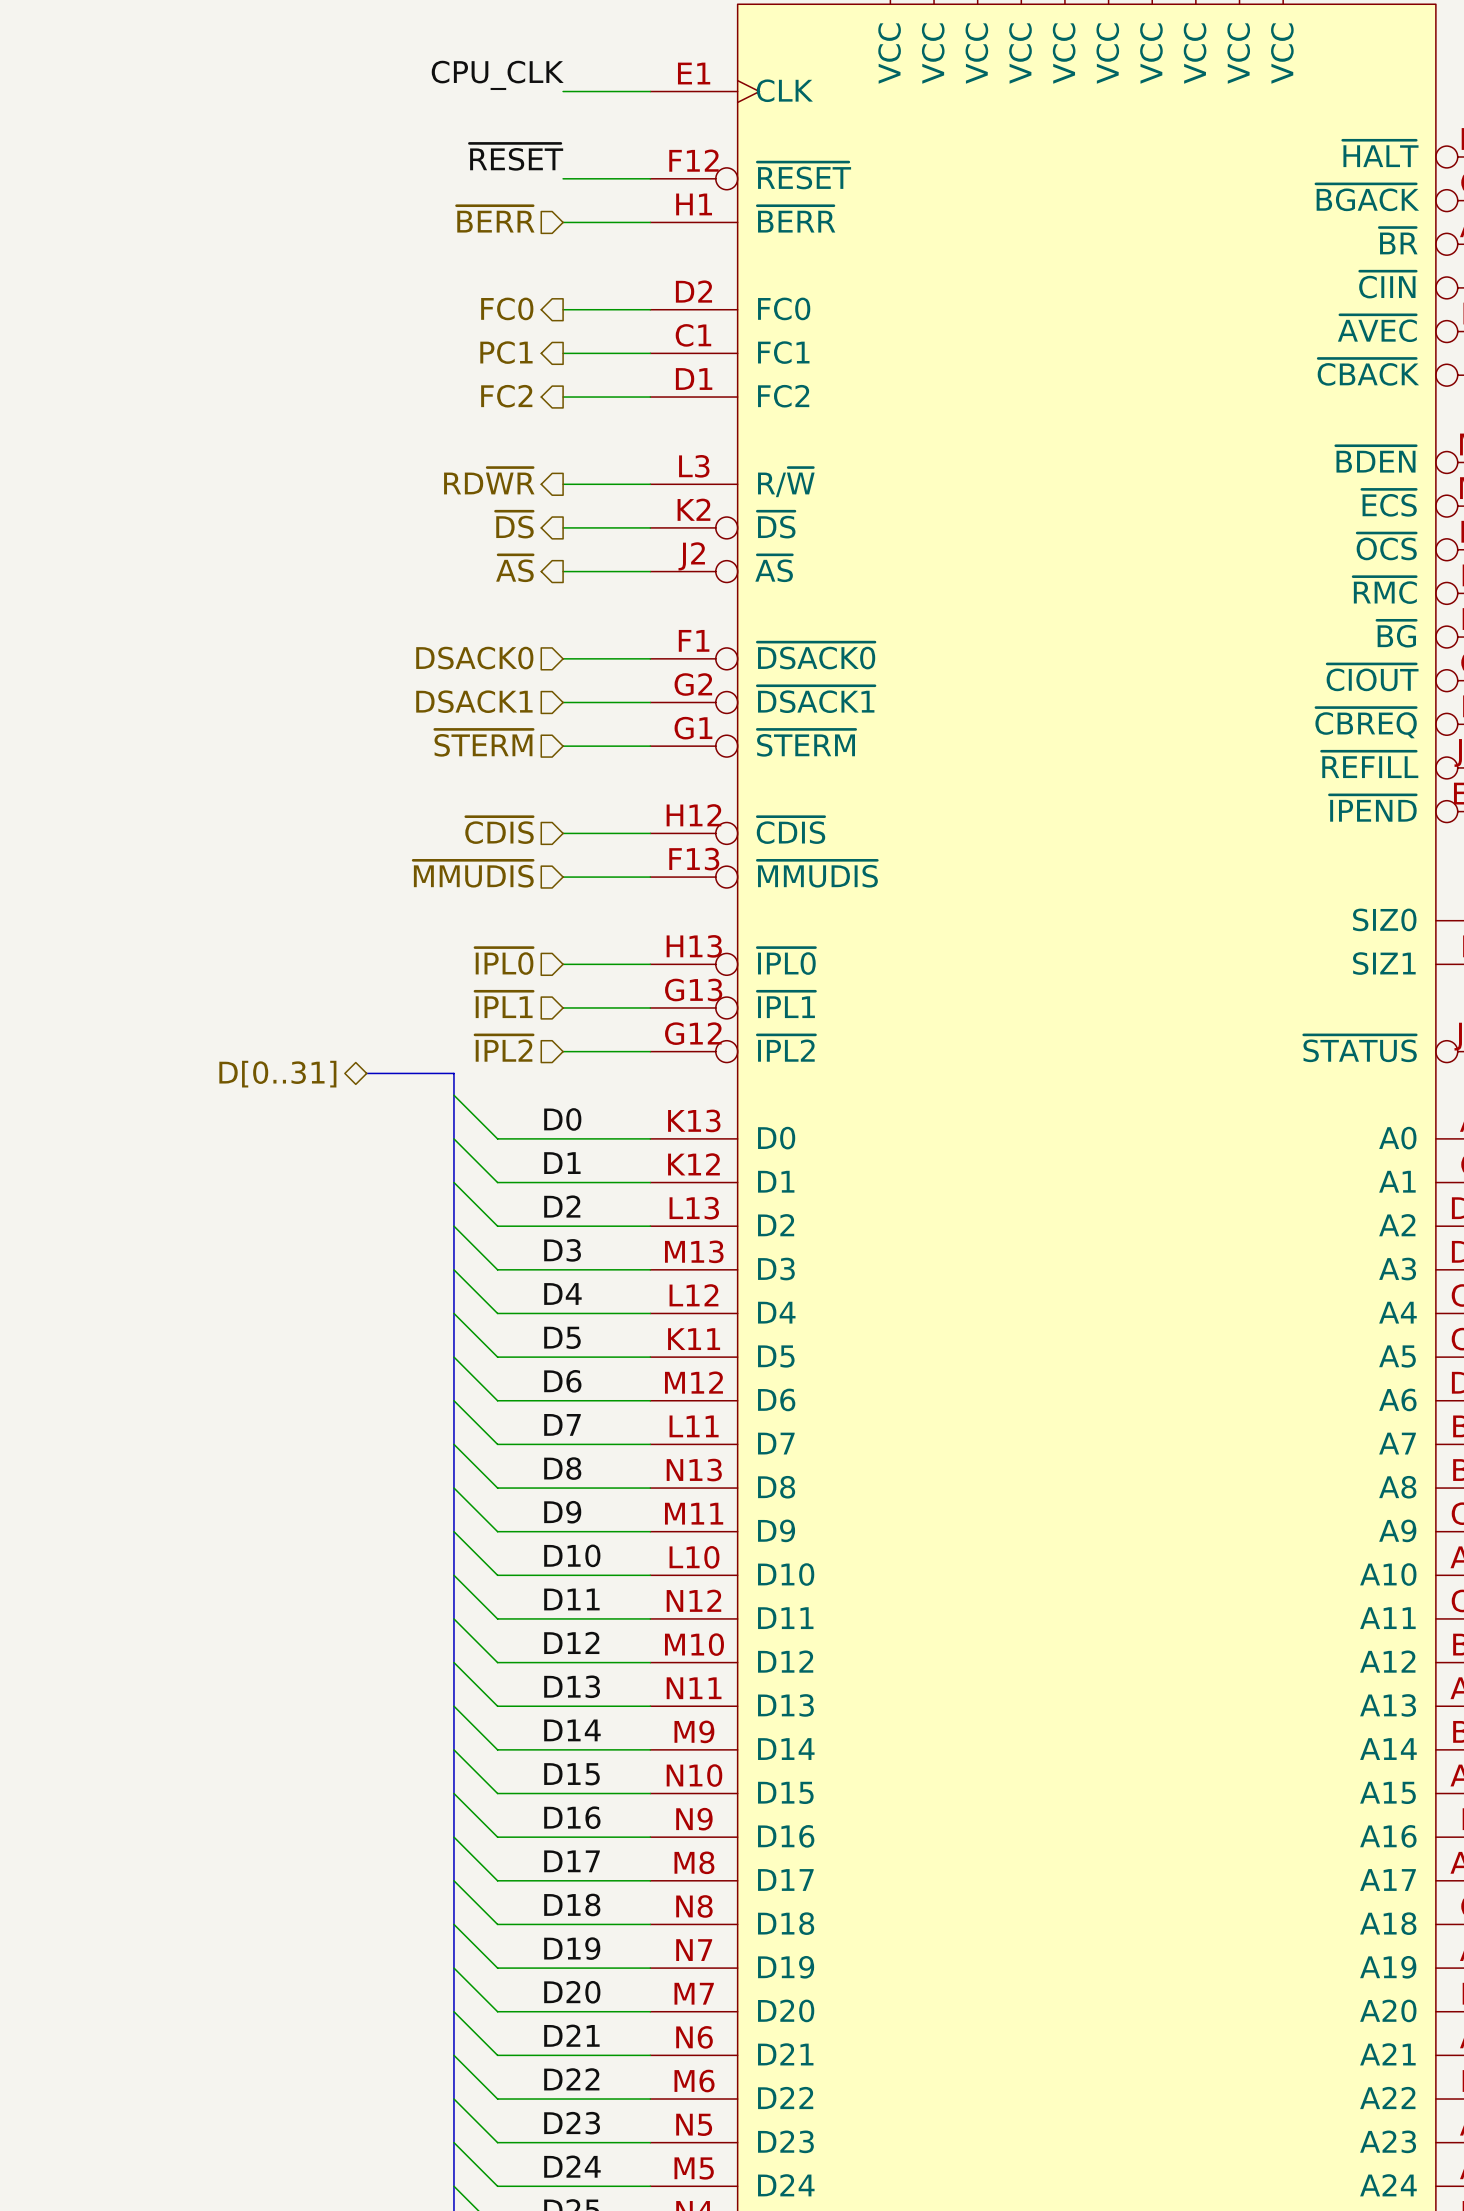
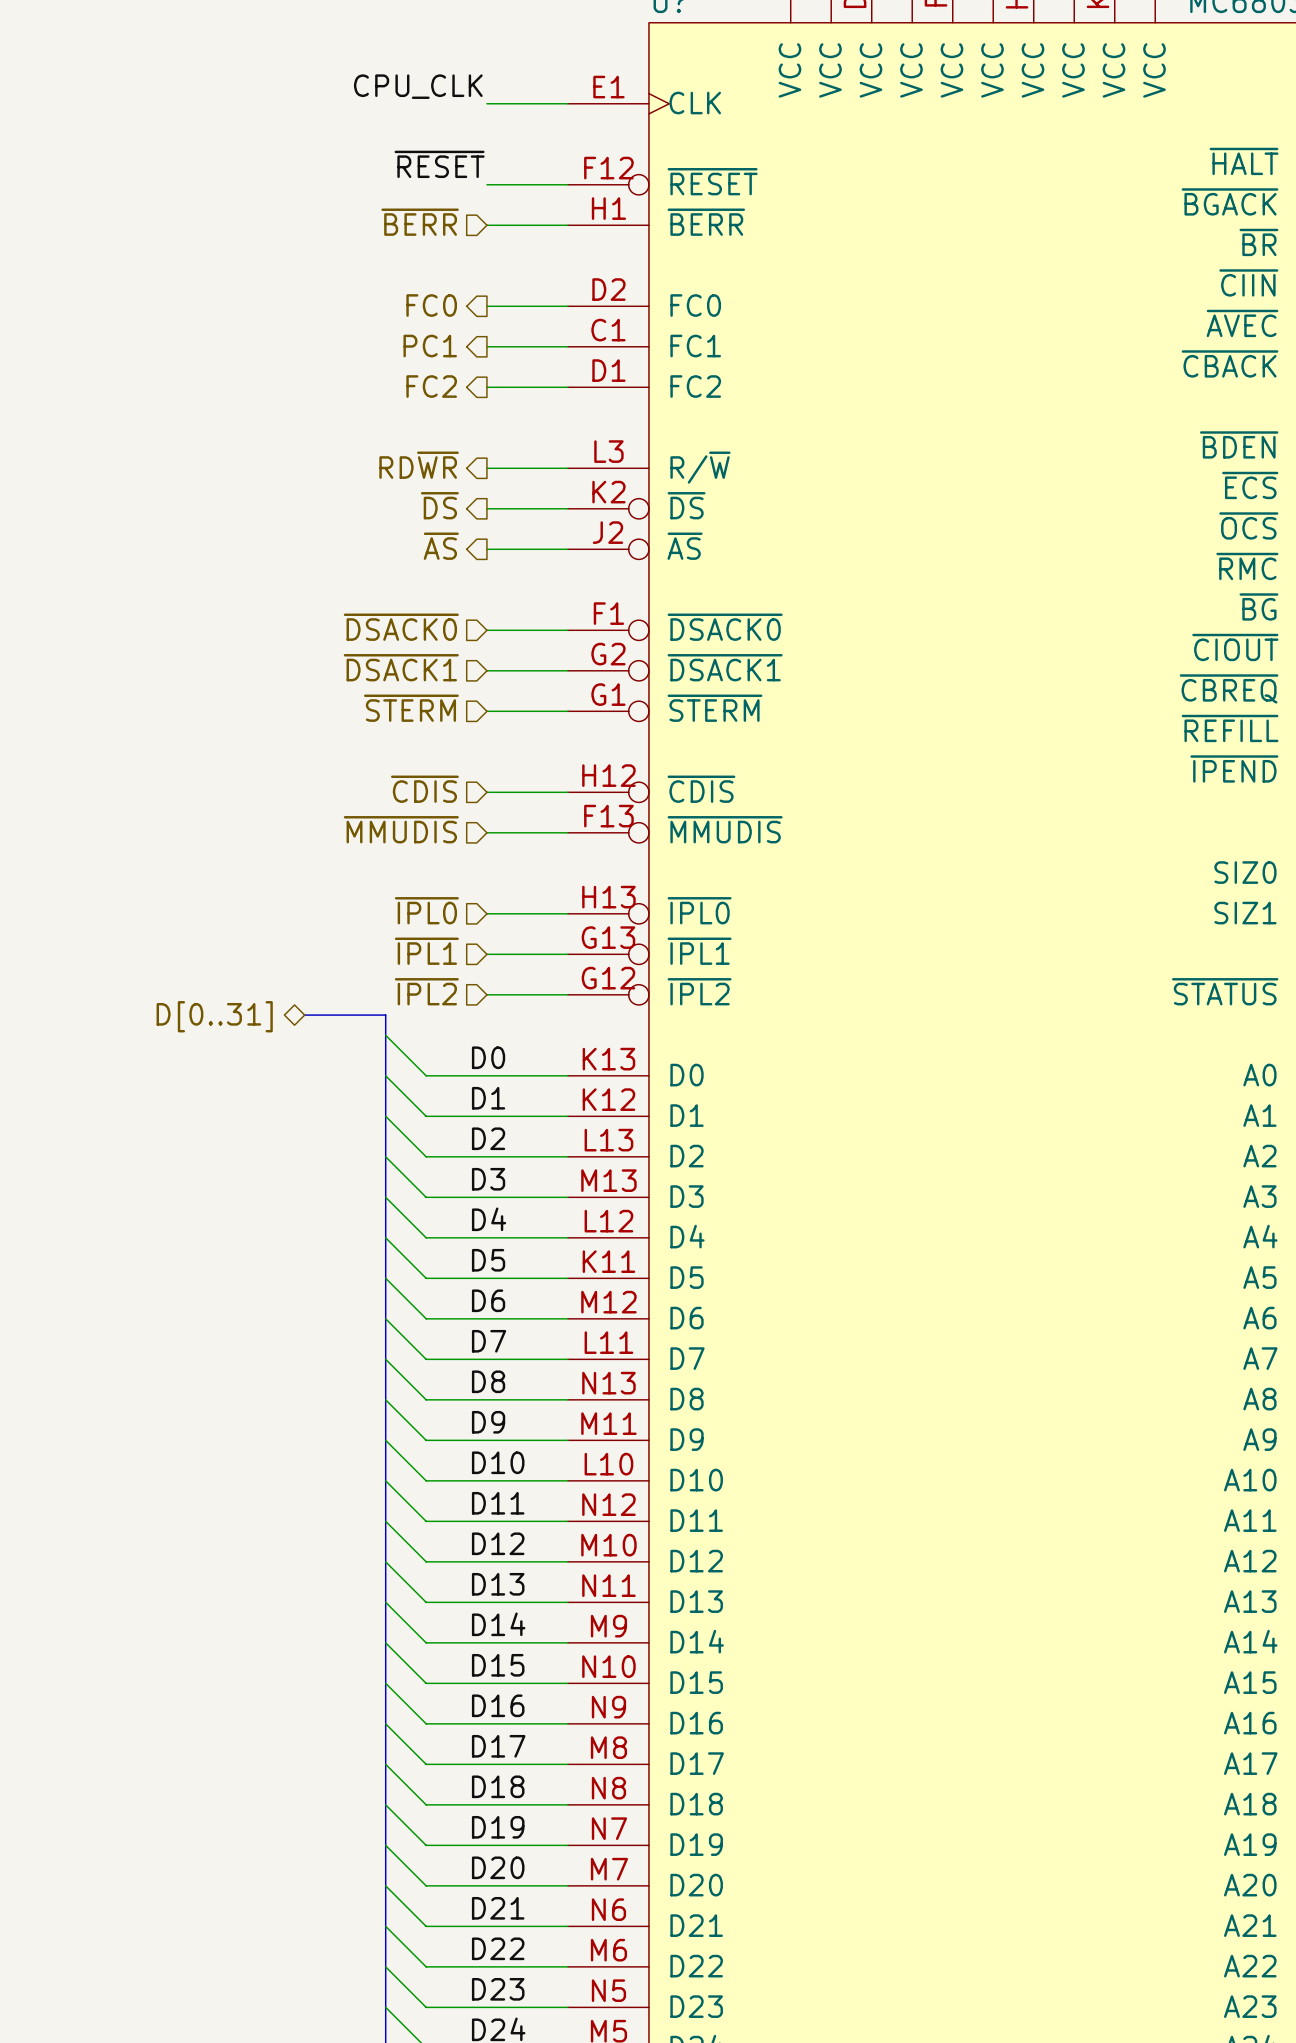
hierarchical label: DSACK0 (474, 658) -> ~{DSACK0} (401, 627)
hierarchical label: DSACK1 (474, 701) -> ~{DSACK1} (401, 667)

